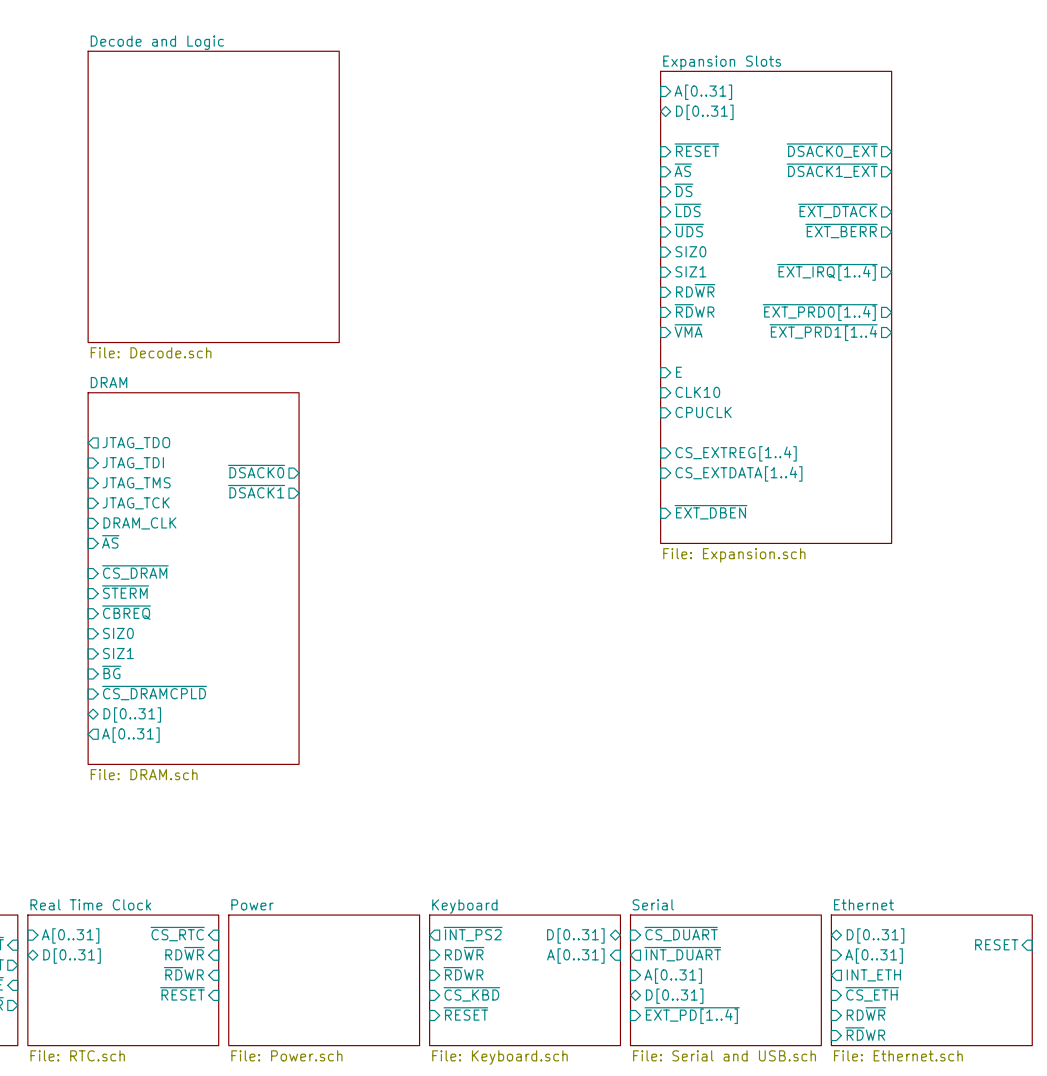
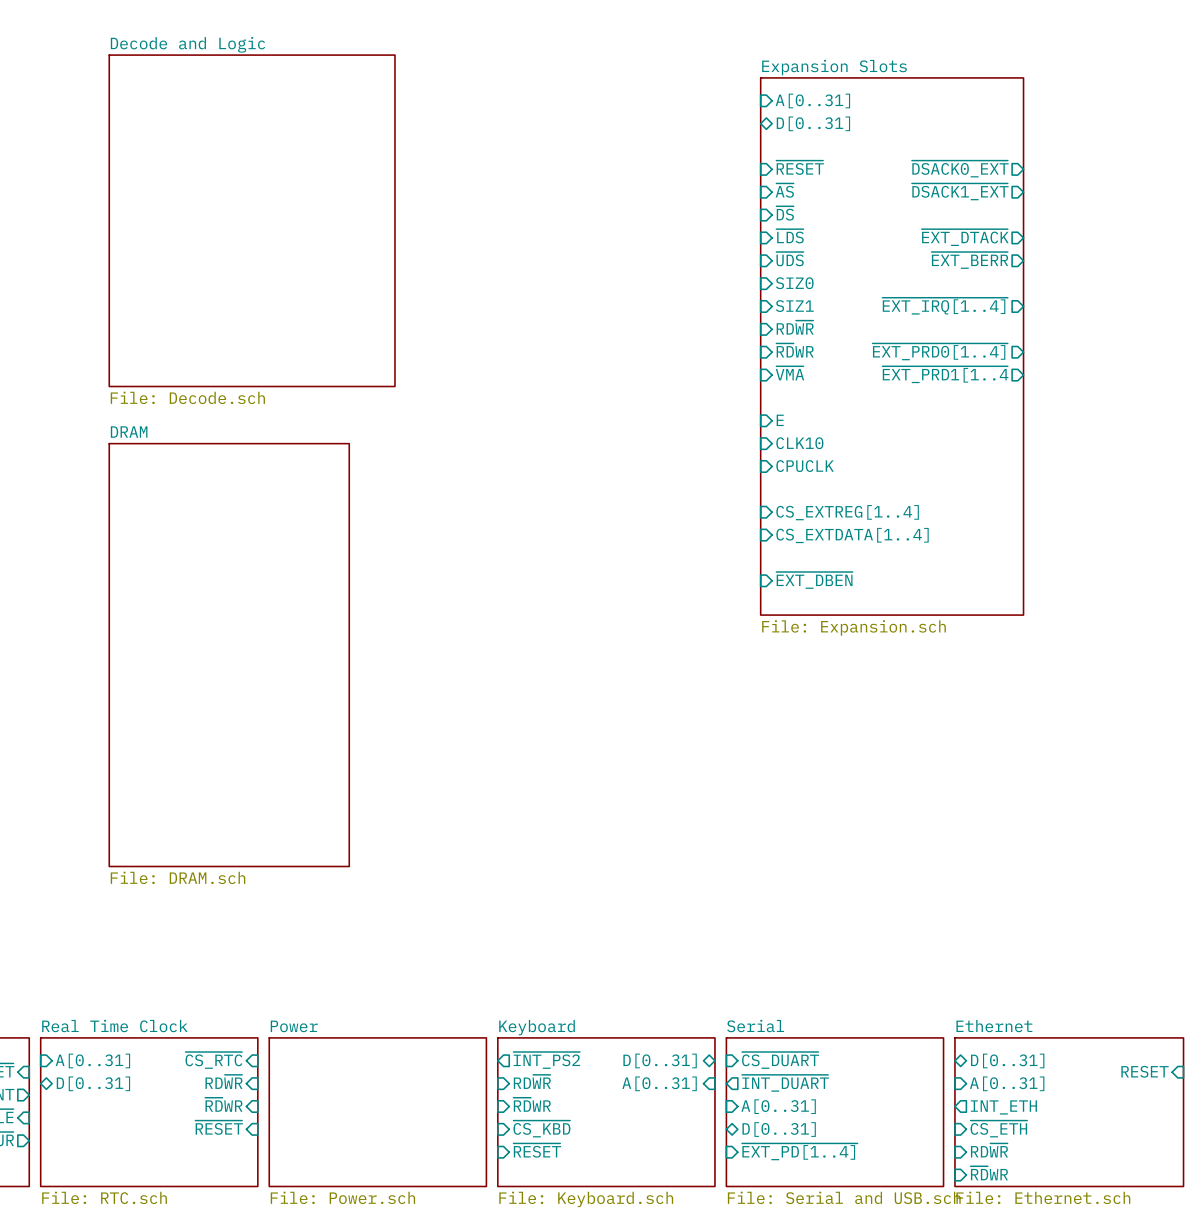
sheet pin: JTAG_TDO (136, 443) -> none
sheet pin: JTAG_TDI (133, 463) -> none
sheet pin: ~{DSACK0} (256, 471) -> none
sheet pin: JTAG_TMS (136, 483) -> none
sheet pin: ~{DSACK1} (256, 491) -> none
sheet pin: JTAG_TCK (136, 503) -> none
sheet pin: DRAM_CLK (139, 523) -> none
sheet pin: ~{AS} (110, 541) -> none
sheet pin: ~{CS_DRAM} (135, 572) -> none
sheet pin: ~{STERM} (125, 592) -> none
sheet pin: ~{CBREQ} (126, 612) -> none
sheet pin: SIZ0 (118, 633) -> none
sheet pin: SIZ1 (118, 653) -> none
sheet pin: ~{BG} (111, 672) -> none
sheet pin: ~{CS_DRAMCPLD} (154, 693) -> none
sheet pin: D[0..31] (132, 714) -> none
sheet pin: A[0..31] (130, 735) -> none

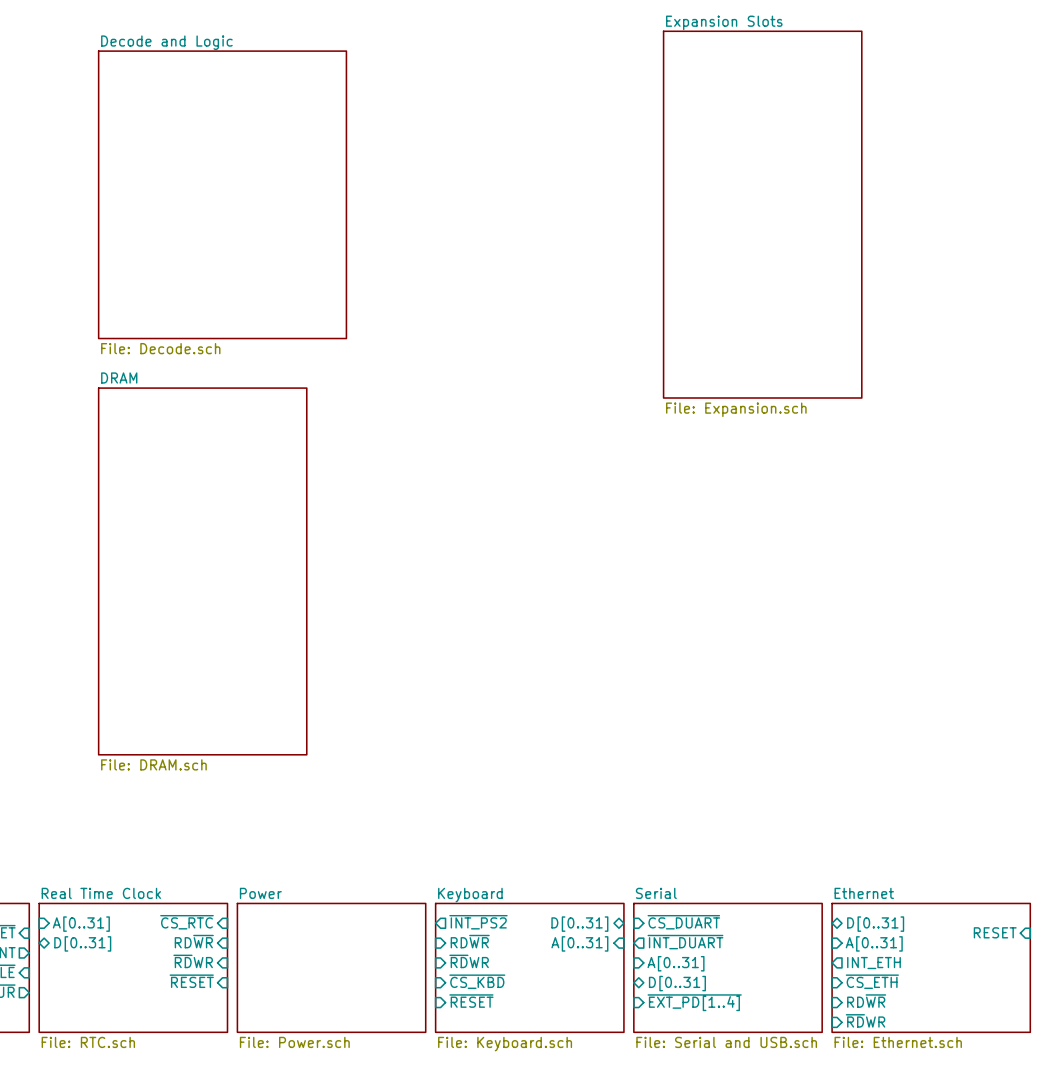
sheet pin: A[0..31] (812, 100) -> none
sheet pin: D[0..31] (813, 123) -> none
sheet pin: ~{RESET} (800, 167) -> none
sheet pin: ~{DSACK0_EXT} (960, 169) -> none
sheet pin: ~{AS} (784, 190) -> none
sheet pin: ~{DSACK1_EXT} (960, 191) -> none
sheet pin: ~{DS} (785, 213) -> none
sheet pin: ~{LDS} (790, 236) -> none
sheet pin: ~{EXT_DTACK} (965, 237) -> none
sheet Expansion Slots: none -> File: Expansion.sch (762, 214)
sheet pin: ~{UDS} (790, 259) -> none
sheet pin: ~{EXT_BERR} (969, 260) -> none
sheet pin: SIZ0 (794, 283) -> none
sheet pin: SIZ1 (794, 306) -> none
sheet pin: ~{EXT_IRQ[1..4]} (945, 306) -> none
sheet pin: RD~{WR} (795, 327) -> none
sheet Expansion Slots: File: Expansion.sch (892, 346) -> none
sheet pin: ~{RD}WR (794, 350) -> none
sheet pin: ~{EXT_PRD0[1..4]} (940, 351) -> none
sheet pin: ~{VMA} (789, 373) -> none
sheet pin: ~{EXT_PRD1[1..4} (945, 374) -> none
sheet pin: E (780, 420) -> none
sheet pin: CLK10 (799, 443) -> none
sheet pin: CPUCLK (805, 466) -> none
sheet pin: CS_EXTREG[1..4] (847, 512) -> none
sheet pin: CS_EXTDATA[1..4] (852, 535) -> none
sheet pin: ~{EXT_DBEN} (814, 580) -> none

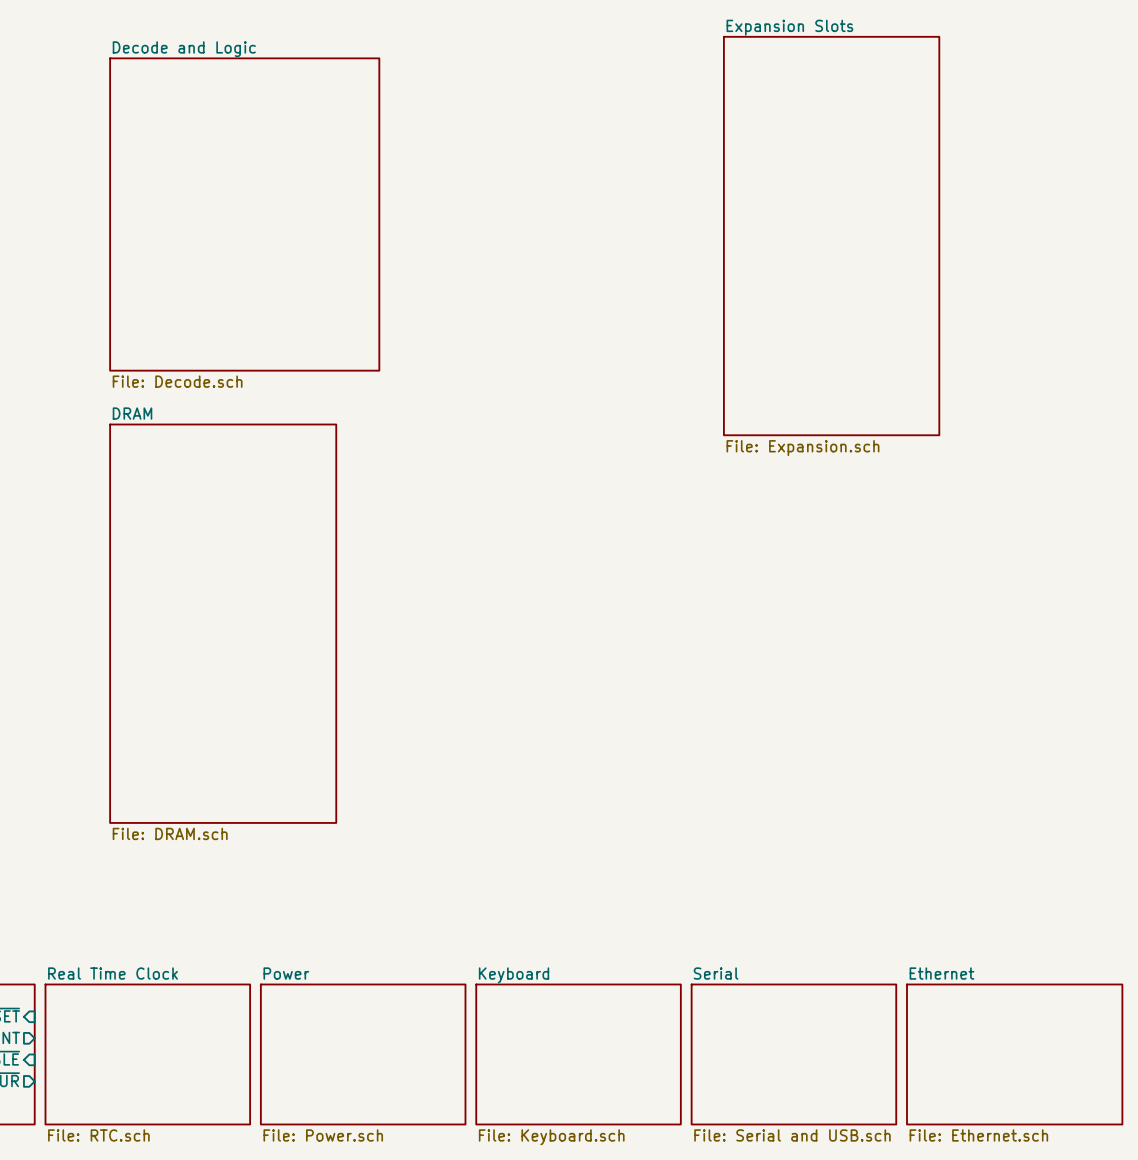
sheet pin: ~{CS_RTC} (186, 922) -> none
sheet pin: ~{INT_PS2} (478, 922) -> none
sheet pin: ~{CS_DUART} (683, 922) -> none
sheet pin: A[0..31] (81, 924) -> none
sheet pin: D[0..31] (579, 924) -> none
sheet pin: D[0..31] (875, 924) -> none
sheet pin: RESET (995, 932) -> none
sheet pin: RD~{WR} (194, 941) -> none
sheet pin: RD~{WR} (470, 941) -> none
sheet pin: ~{INT_DUART} (685, 942) -> none
sheet pin: D[0..31] (82, 943) -> none
sheet pin: A[0..31] (579, 943) -> none
sheet pin: A[0..31] (874, 943) -> none
sheet pin: ~{RD}WR (193, 961) -> none
sheet pin: ~{RD}WR (469, 961) -> none
sheet pin: A[0..31] (676, 963) -> none
sheet pin: INT_ETH (873, 963) -> none
sheet pin: ~{RESET} (191, 981) -> none
sheet pin: ~{CS_KBD} (477, 981) -> none
sheet pin: ~{CS_ETH} (872, 981) -> none
sheet pin: D[0..31] (677, 983) -> none
sheet pin: ~{RESET} (471, 1001) -> none
sheet pin: RD~{WR} (866, 1001) -> none
sheet pin: ~{EXT_PD[1..4]} (694, 1002) -> none
sheet pin: ~{RD}WR (865, 1020) -> none

